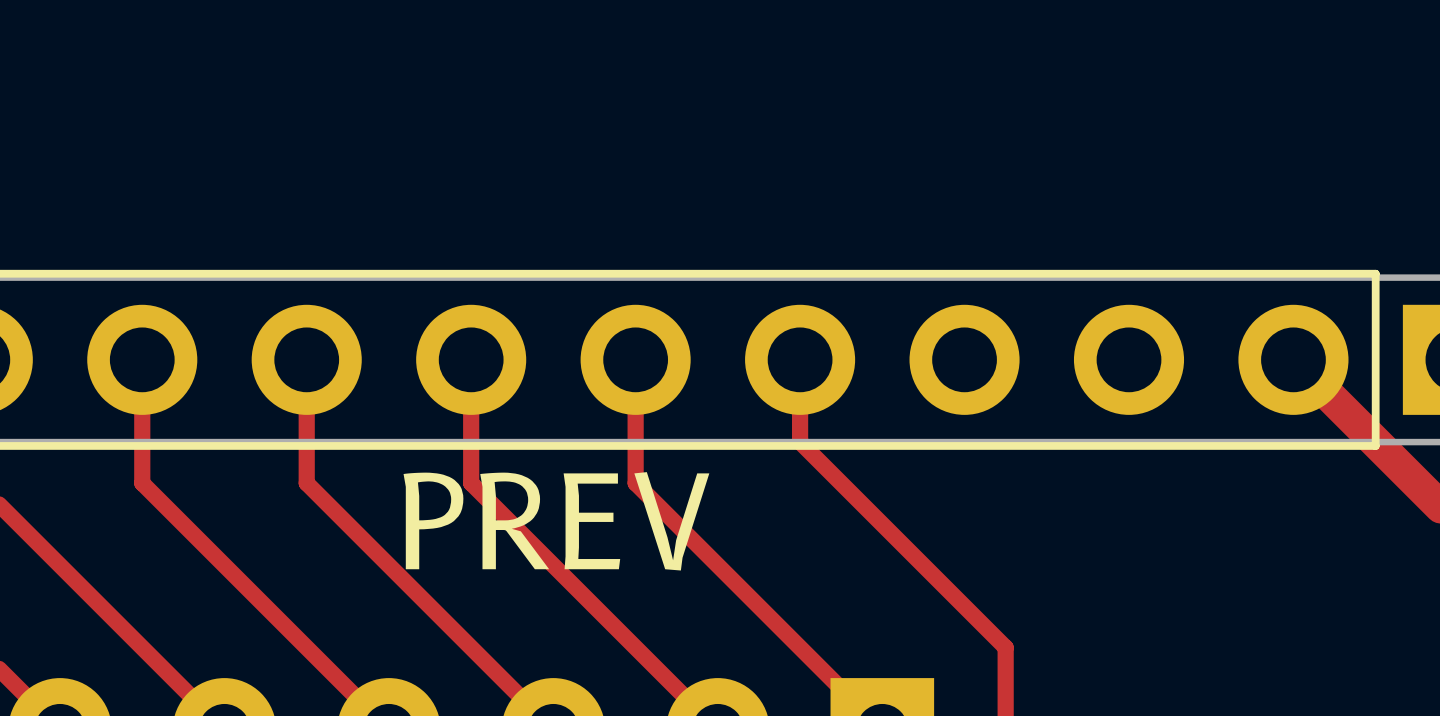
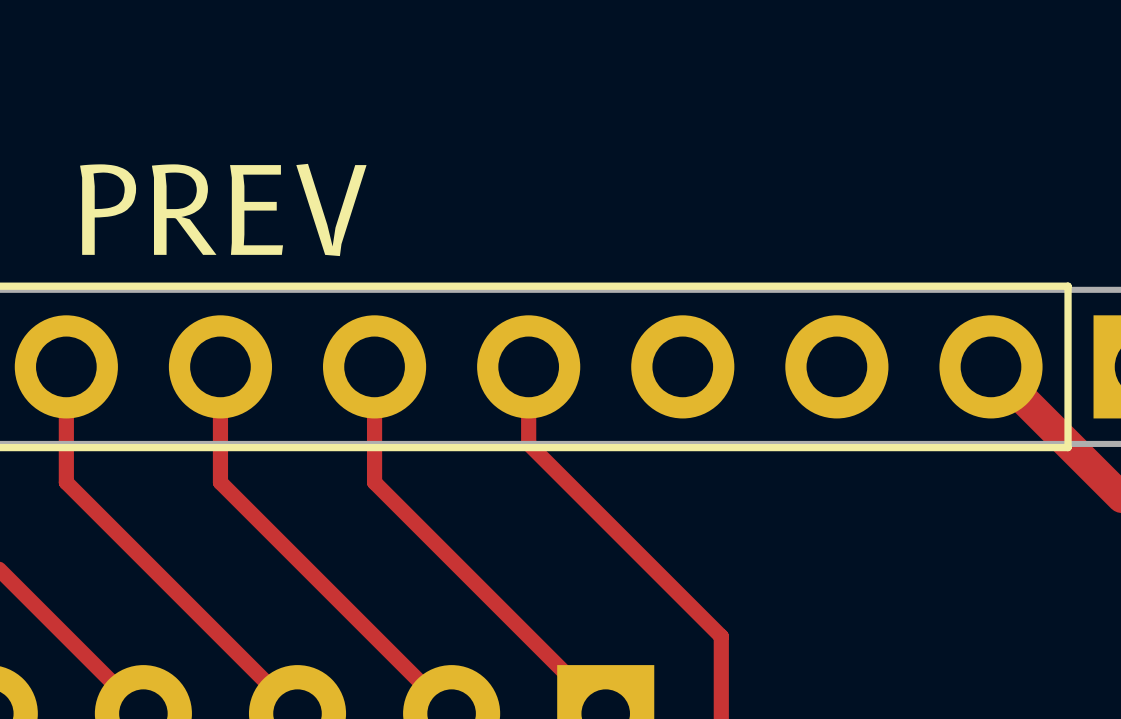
text position: PREV (556, 521) -> PREV (223, 209)

